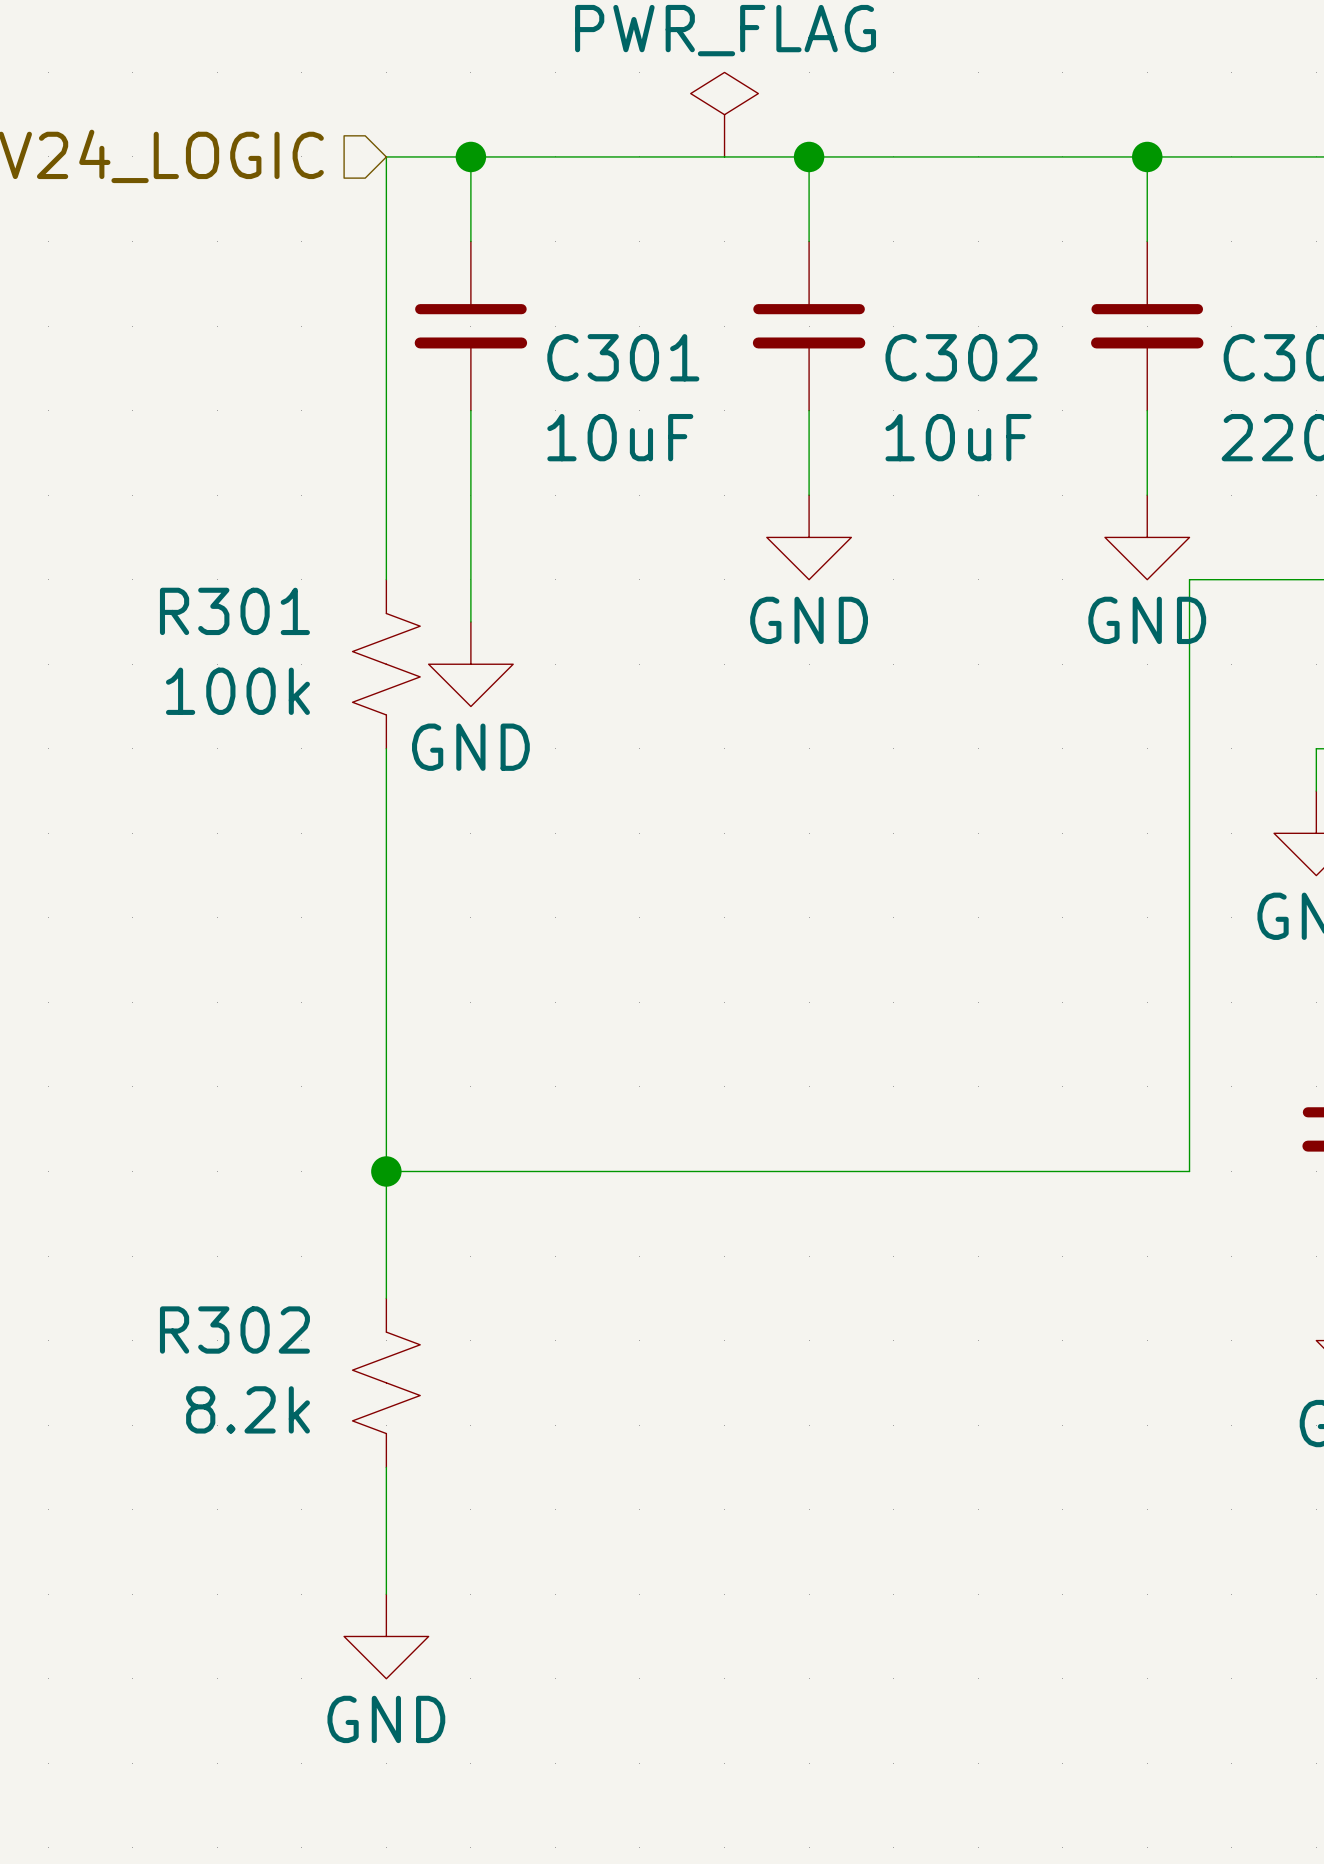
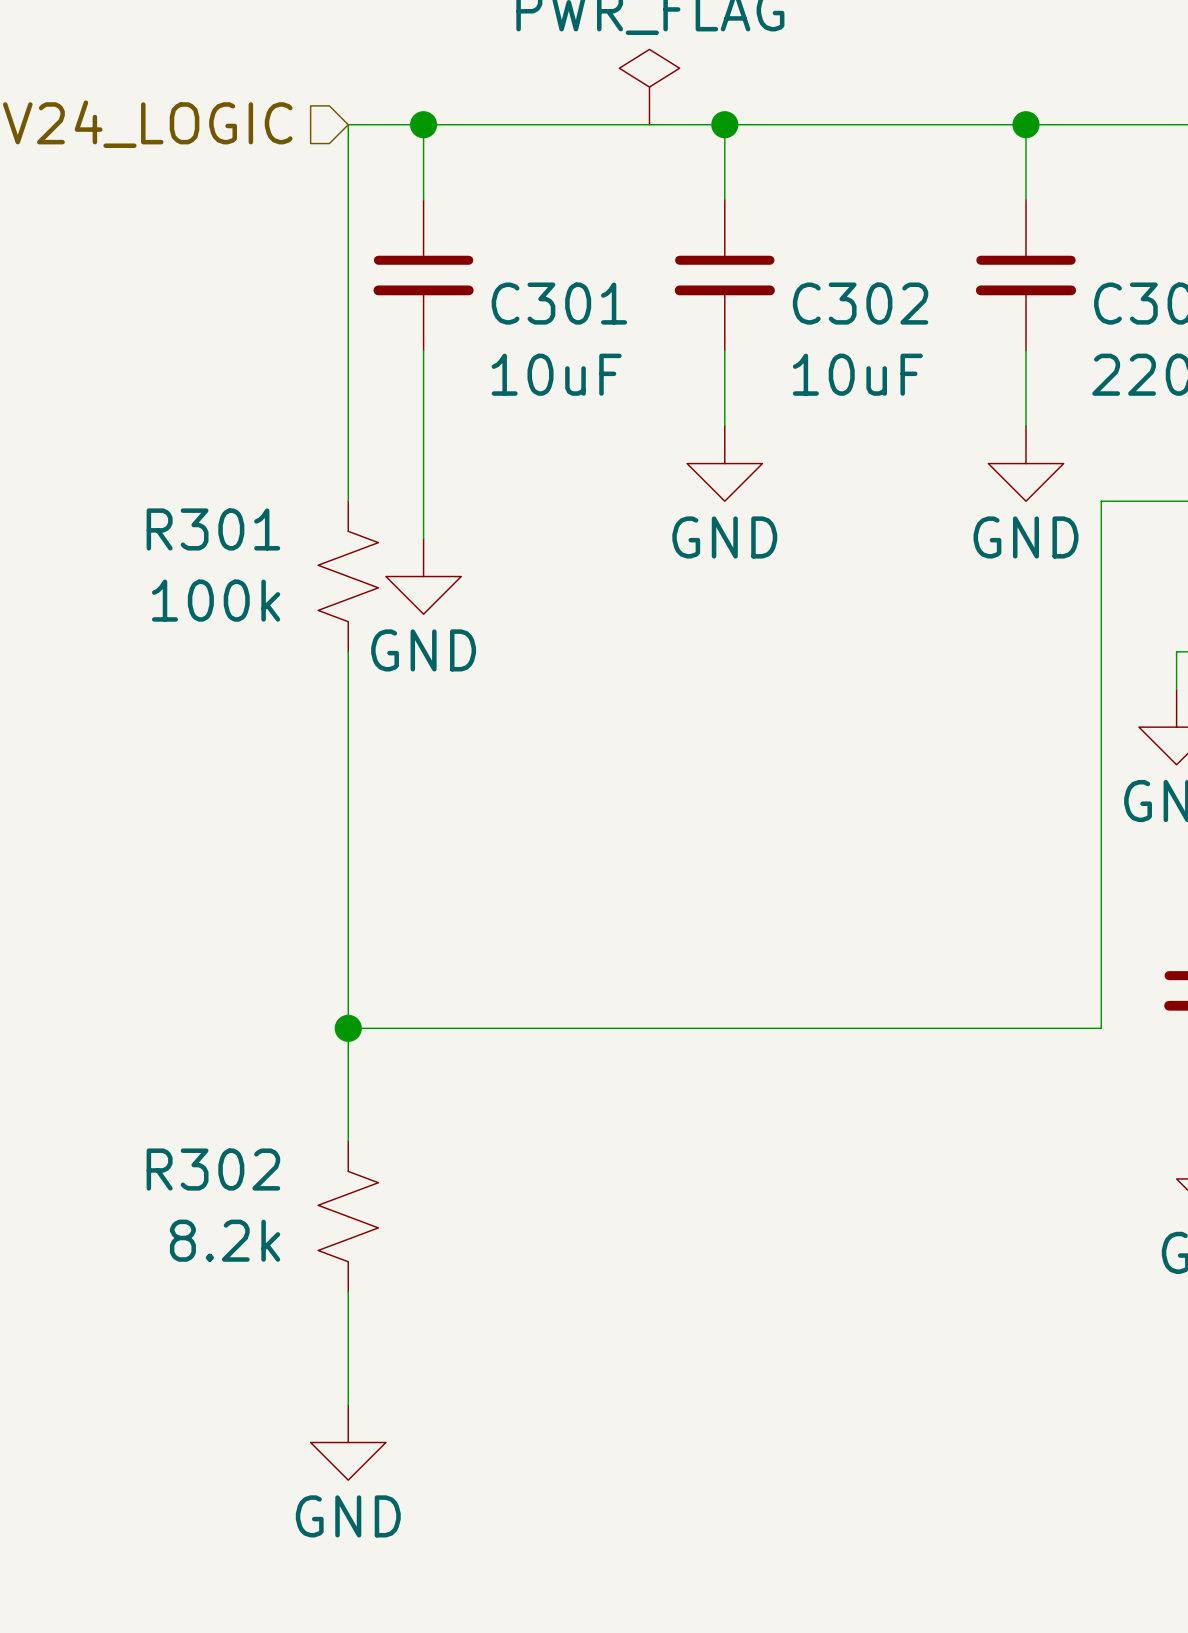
wire: (1231, 579) (1189, 579) (1189, 1171) -> (1101, 501) (1101, 1028) (1063, 1028)

